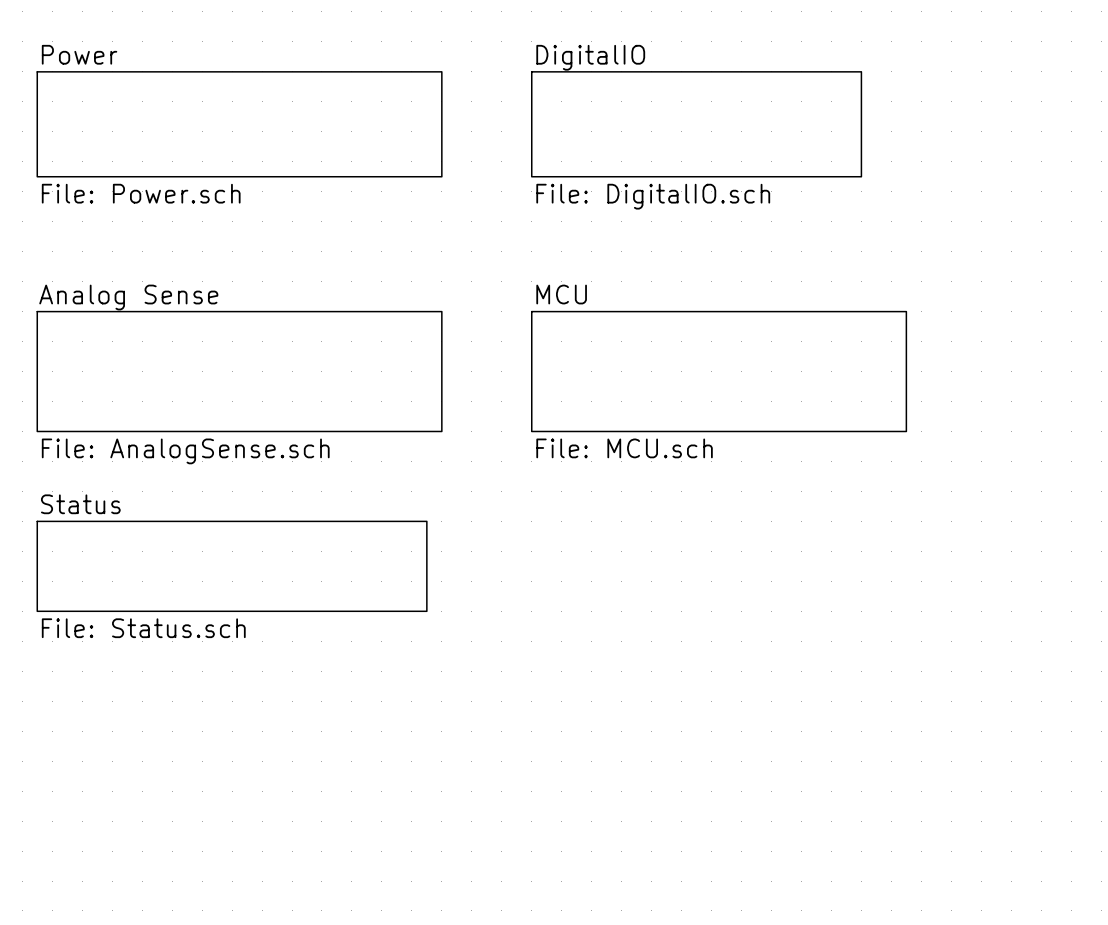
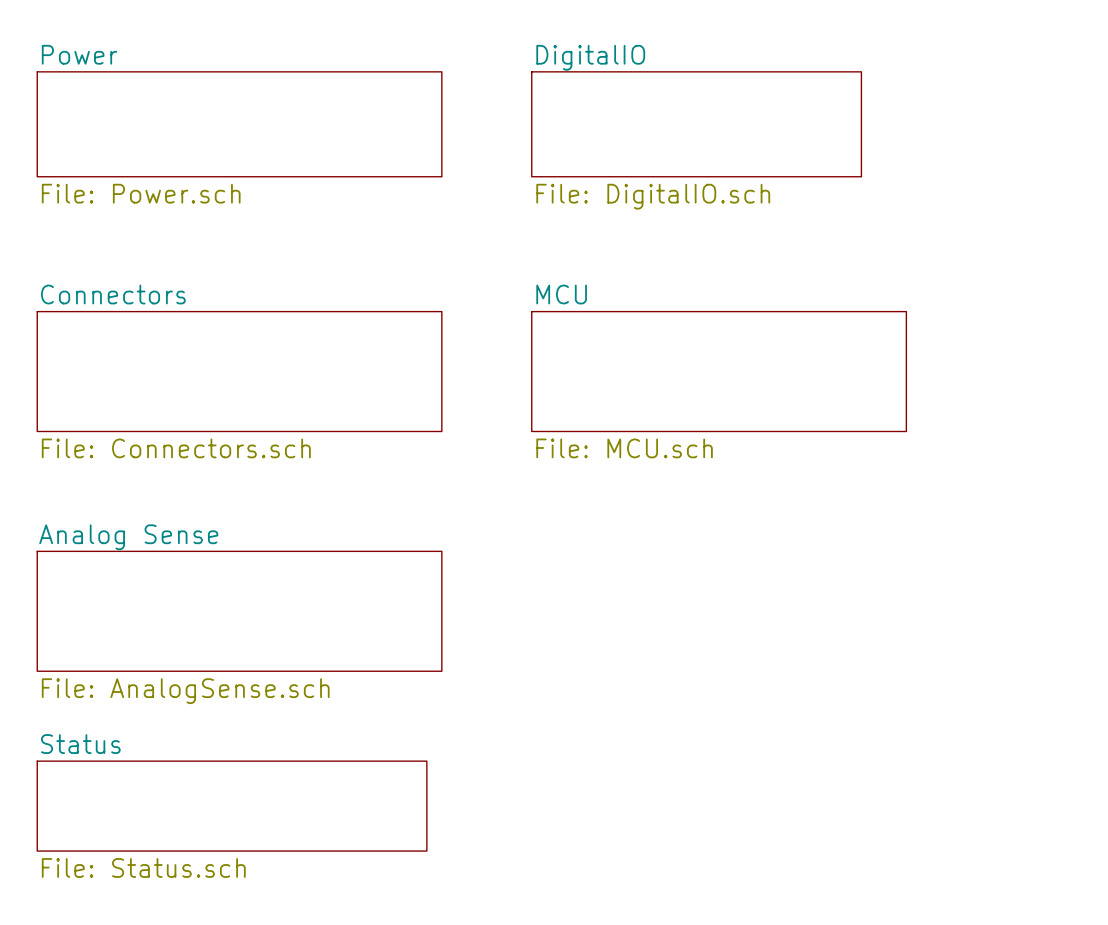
sheet Analog Sense name: Analog Sense (128, 297) -> Connectors (113, 294)
sheet Analog Sense value: File: AnalogSense.sch (185, 451) -> File: Connectors.sch (176, 448)
sheet Status position: (232, 566) -> (232, 806)
sheet Analog Sense: none -> File: AnalogSense.sch (239, 611)

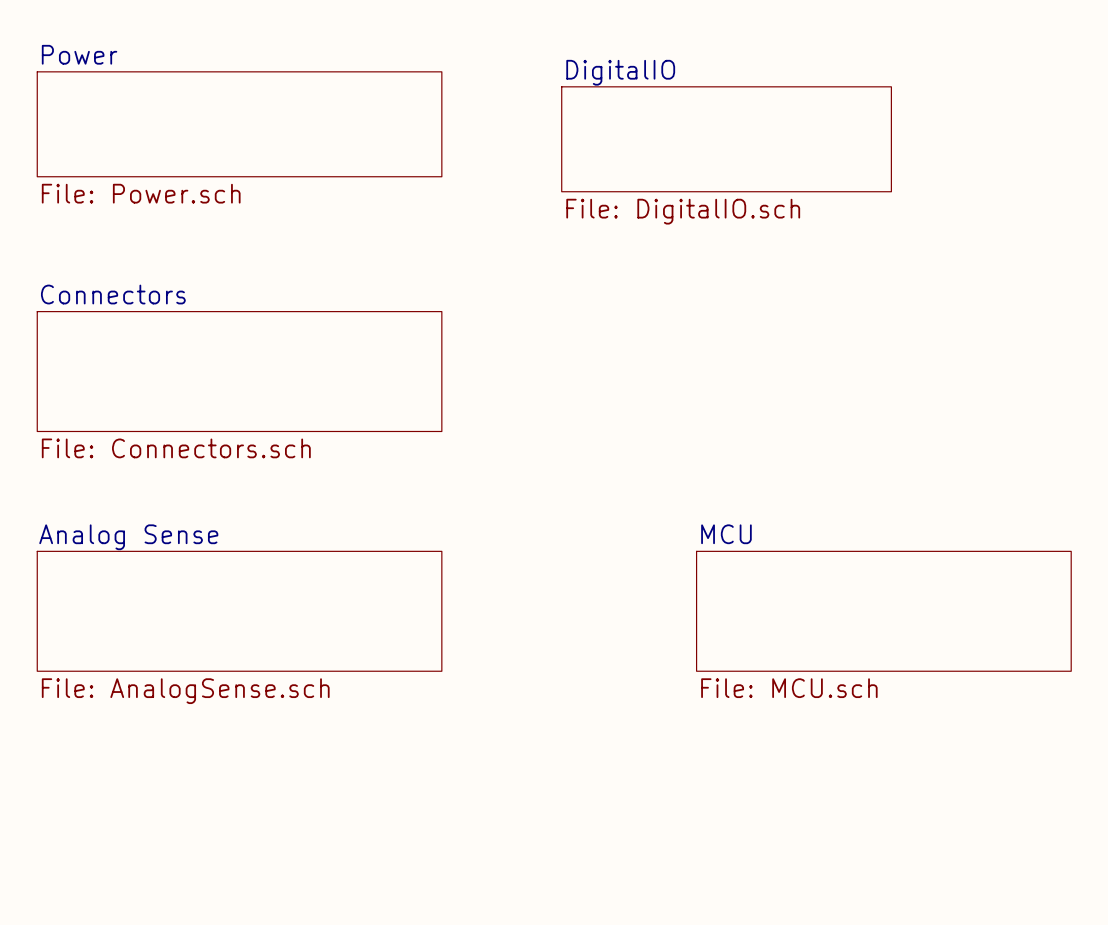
sheet DigitalIO position: (696, 124) -> (726, 139)
sheet MCU position: (719, 371) -> (883, 611)
sheet Status: File: Status.sch (232, 806) -> none

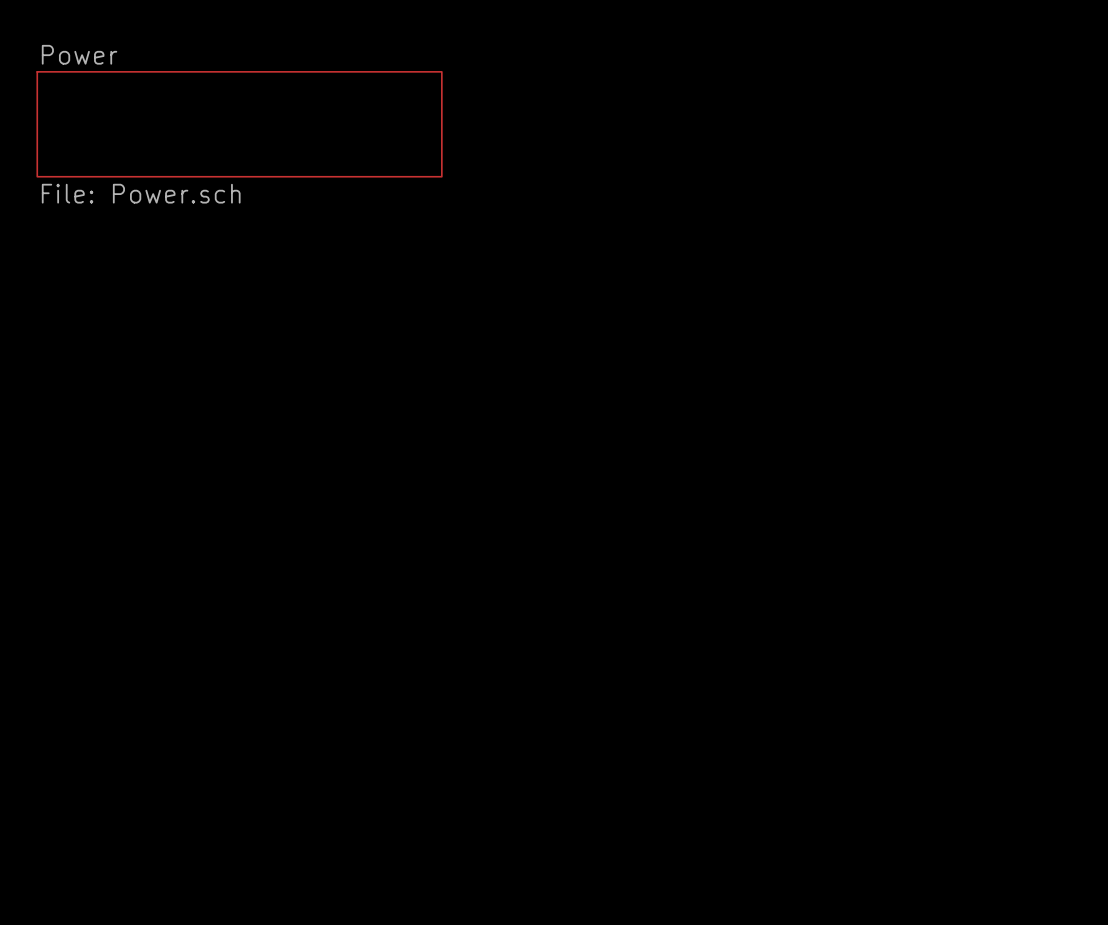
sheet DigitalIO: File: DigitalIO.sch (726, 139) -> none
sheet Connectors: File: Connectors.sch (239, 371) -> none
sheet Analog Sense: File: AnalogSense.sch (239, 611) -> none
sheet MCU: File: MCU.sch (883, 611) -> none

